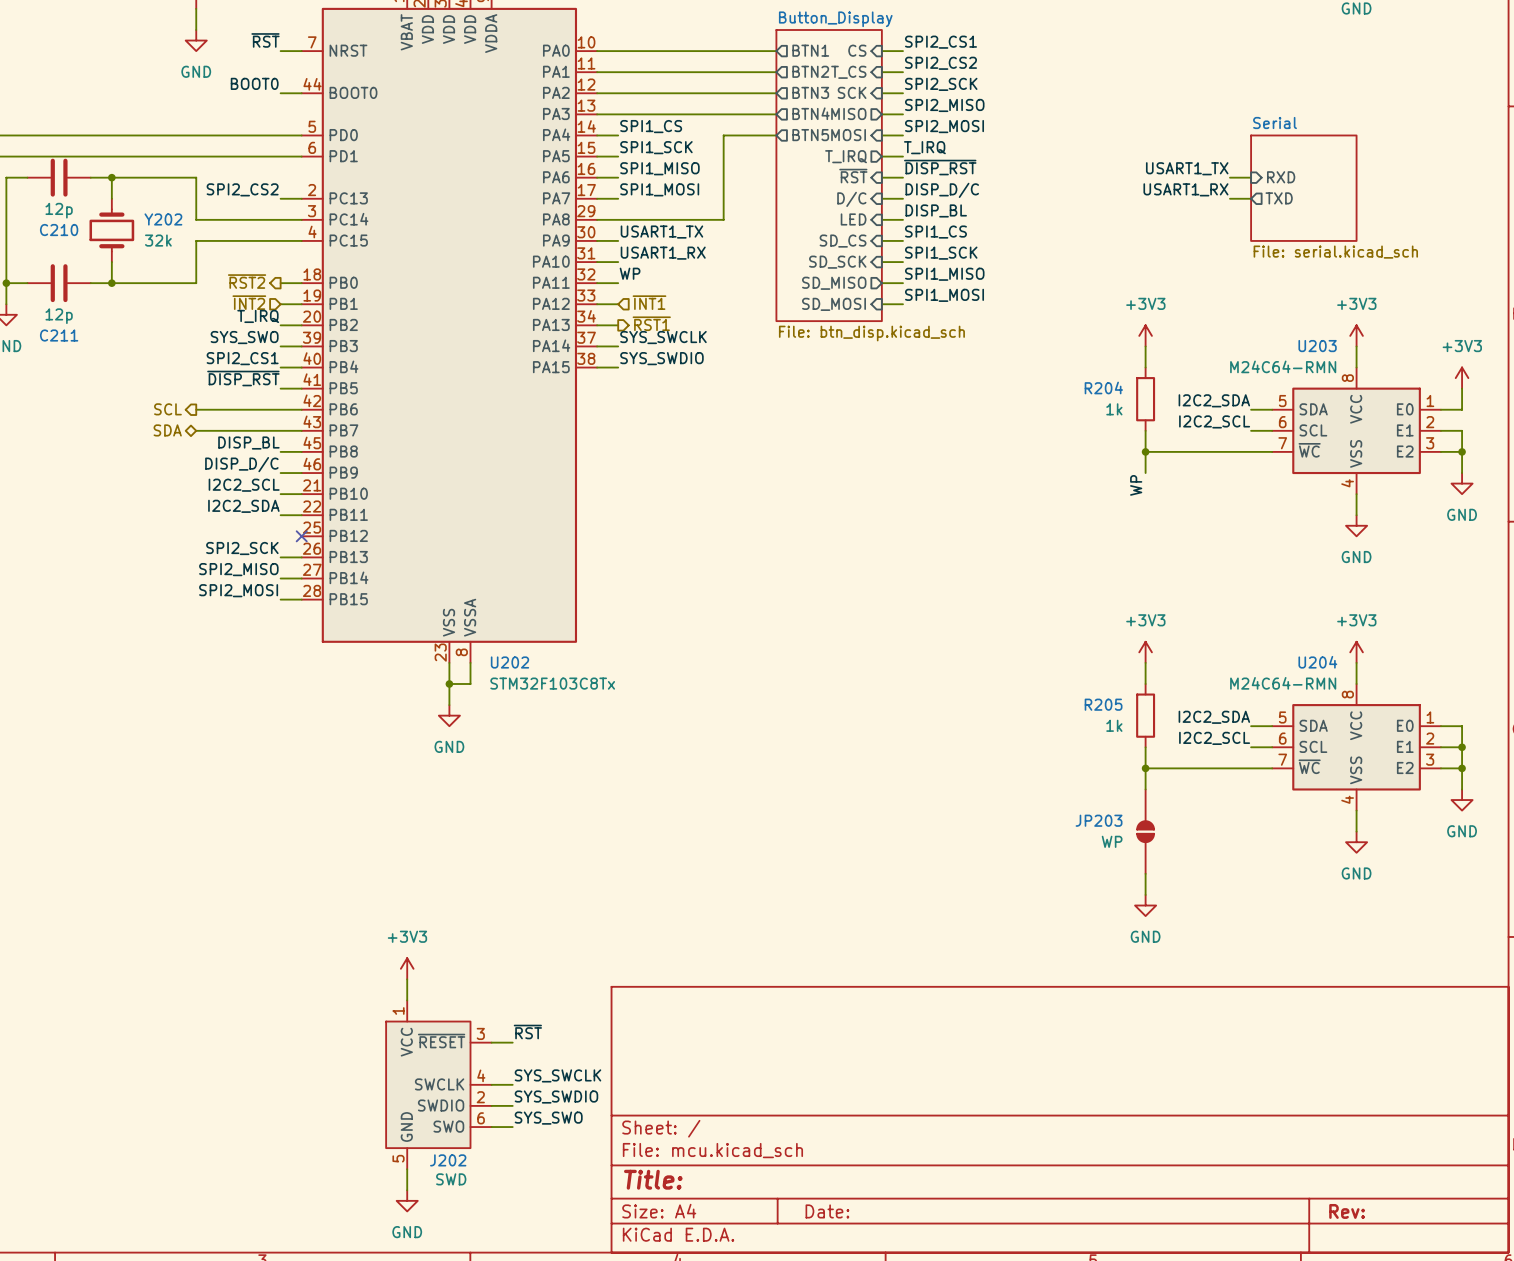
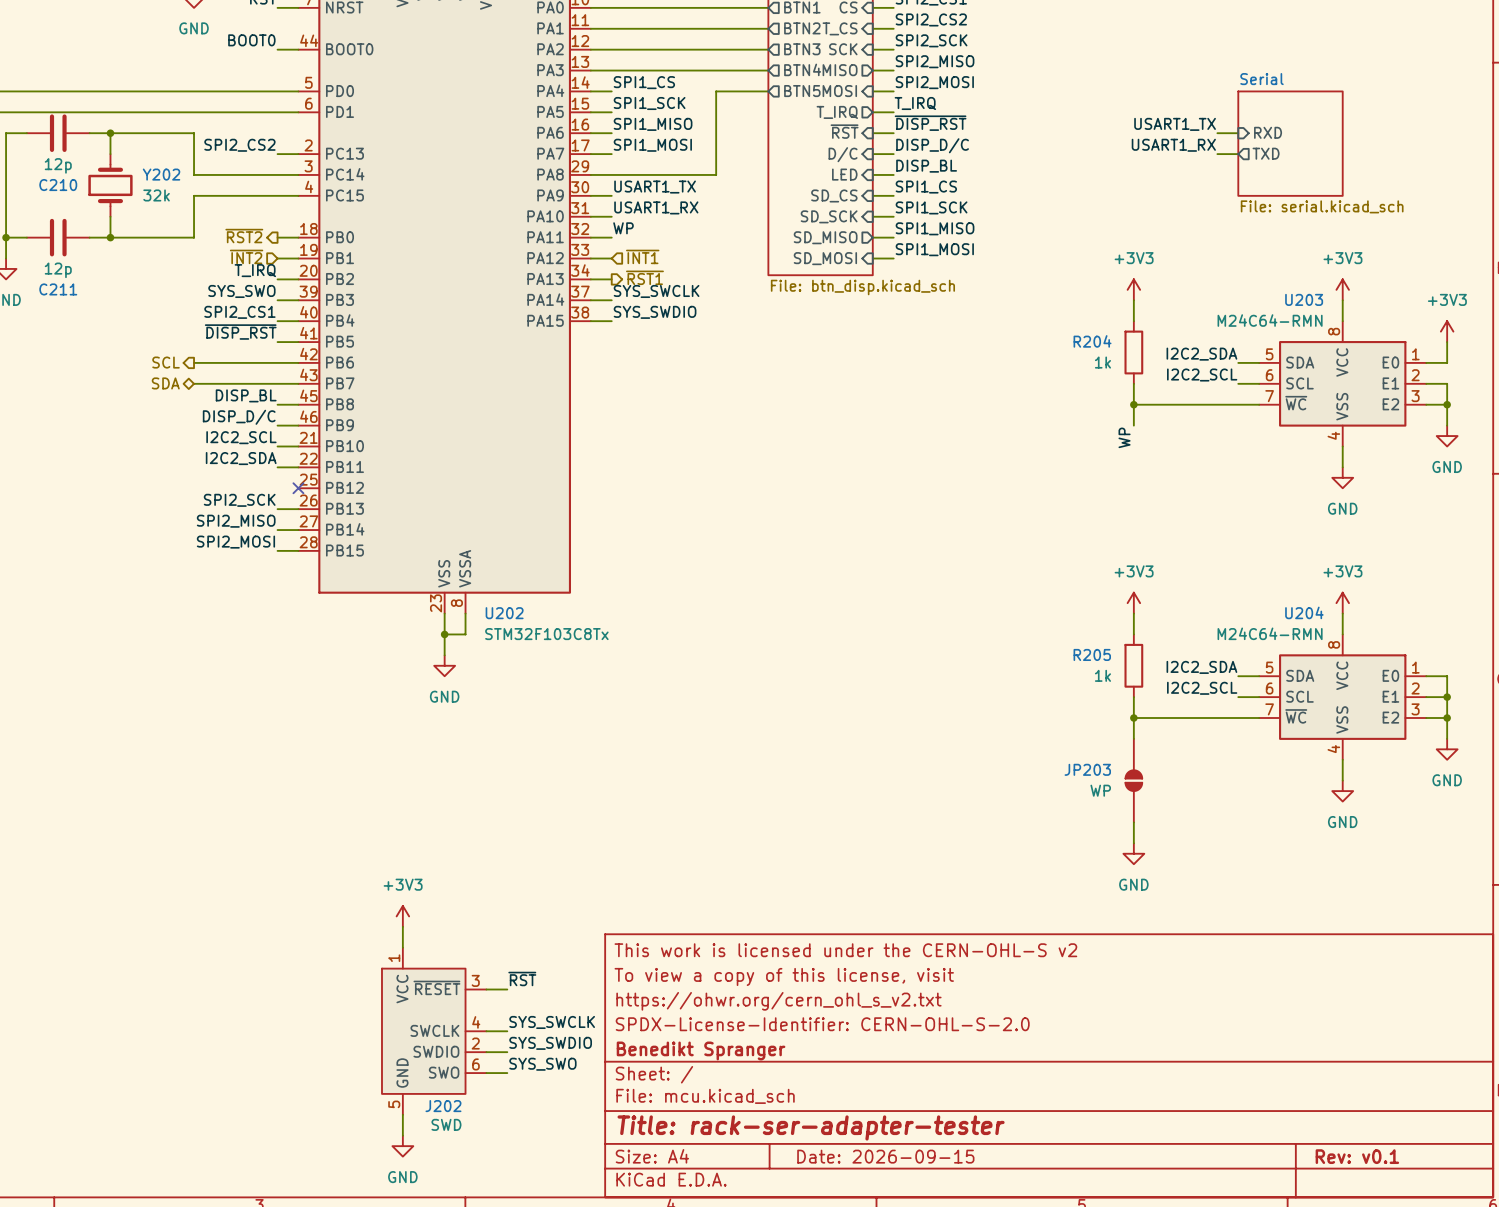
title block: none -> This work is licensed under the CERN-OHL-S v2 (845, 950)
title block: none -> To view a copy of this license, visit (784, 976)
title block: none -> https://ohwr.org/cern_ohl_s_v2.txt (778, 1001)
title block: none -> SPDX-License-Identifier: CERN-OHL-S-2.0 (822, 1024)
title block: none -> Benedikt Spranger (701, 1050)
title block: Title: (653, 1179) -> Title: rack-ser-adapter-tester (811, 1127)
title block: Date: (827, 1211) -> Date: 2026-09-15 (885, 1156)
title block: Rev: (1347, 1211) -> Rev: v0.1 (1357, 1156)

